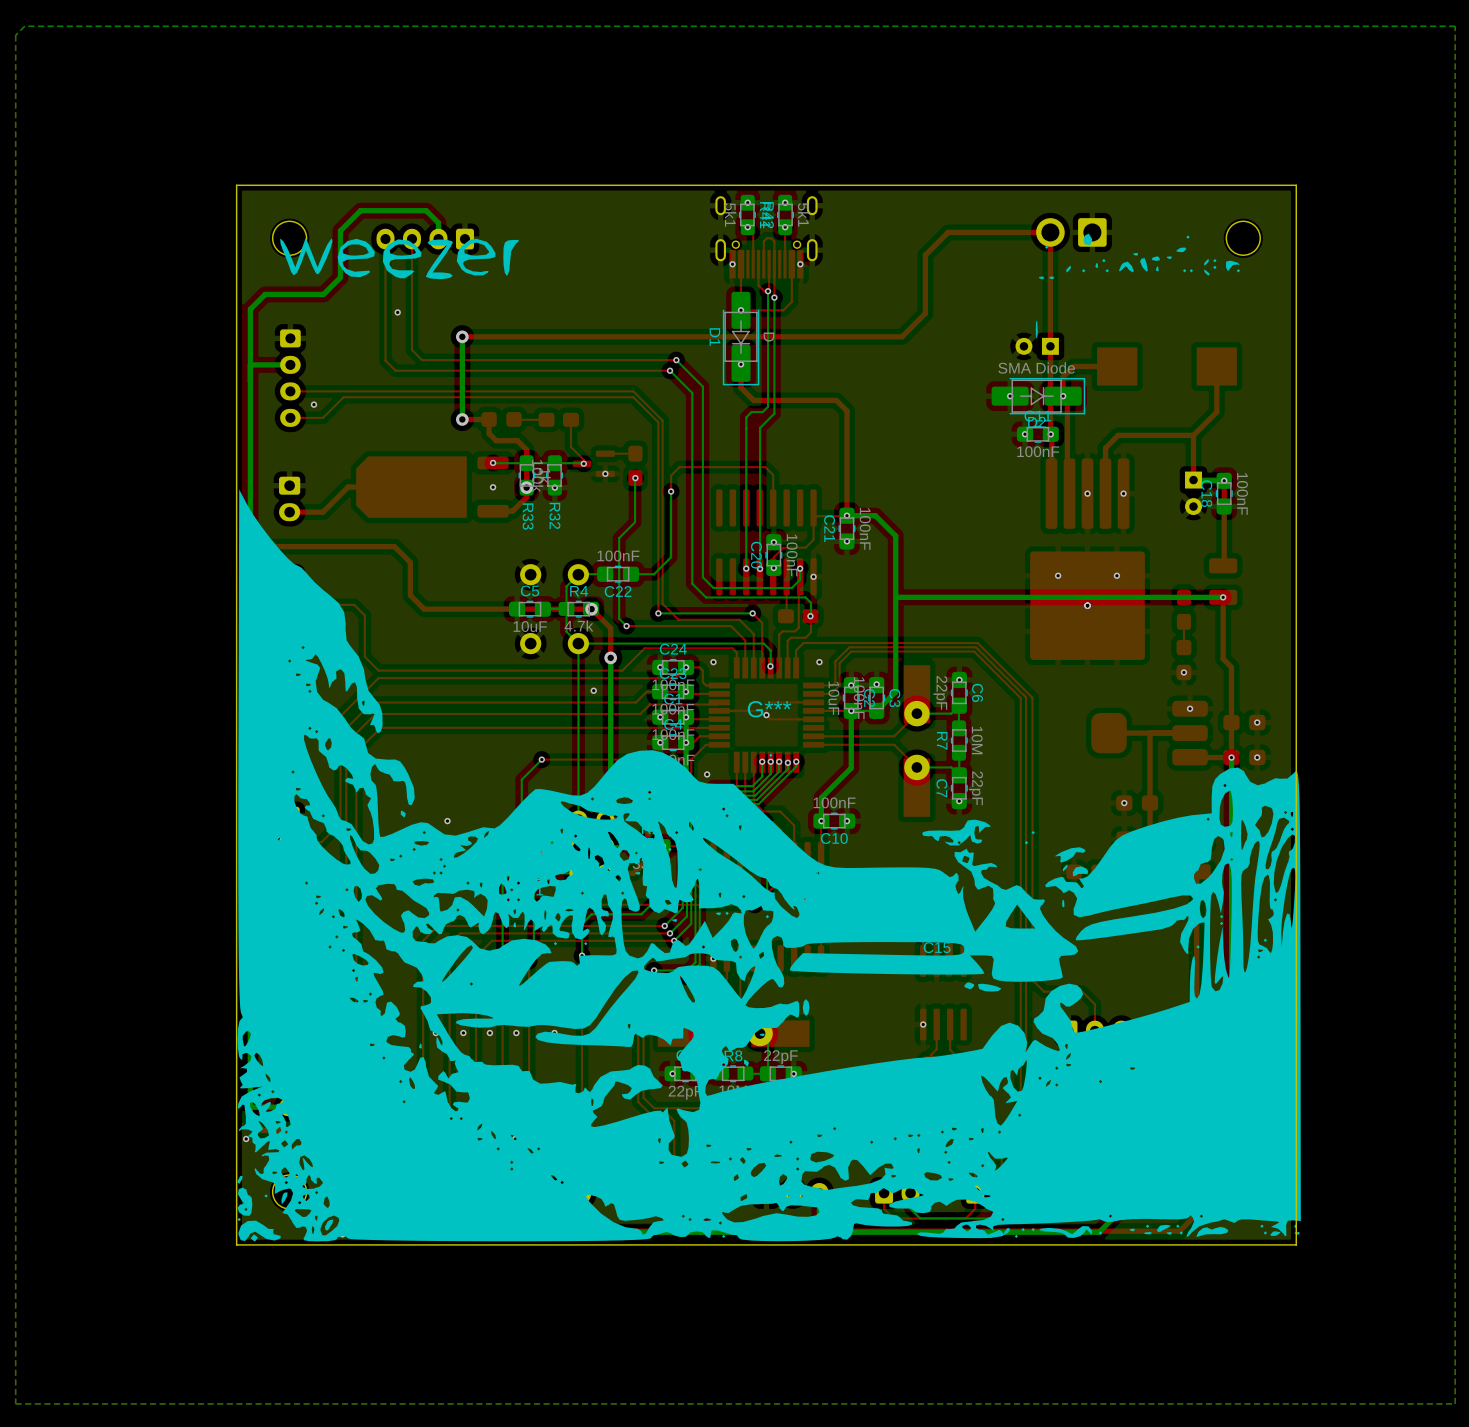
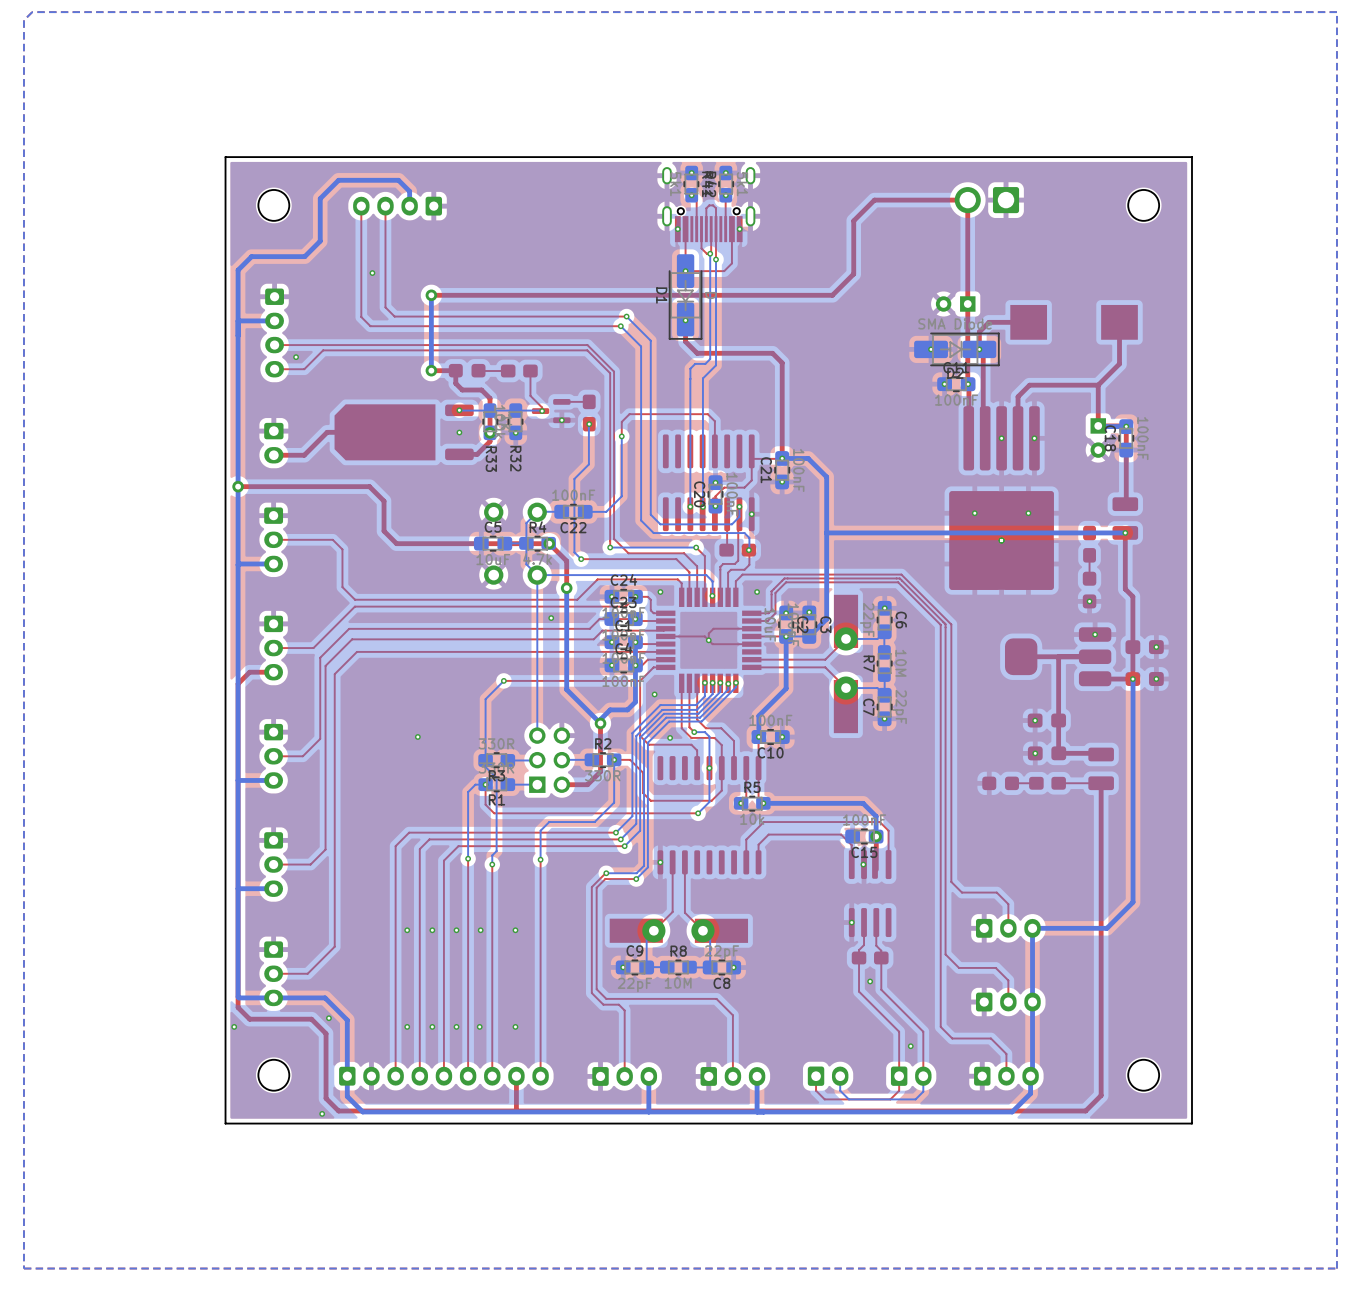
G***: (769, 737) -> none

